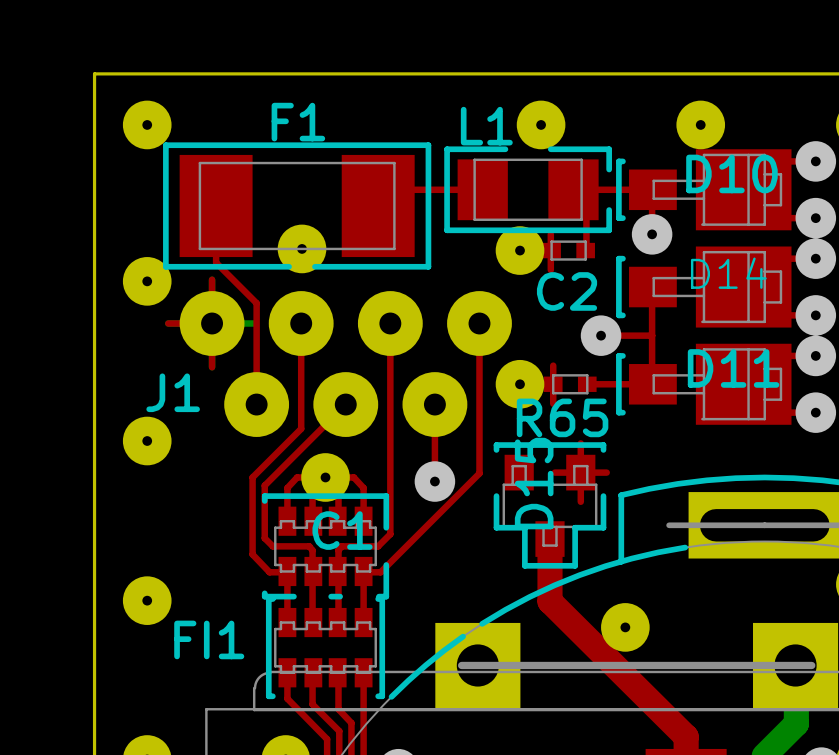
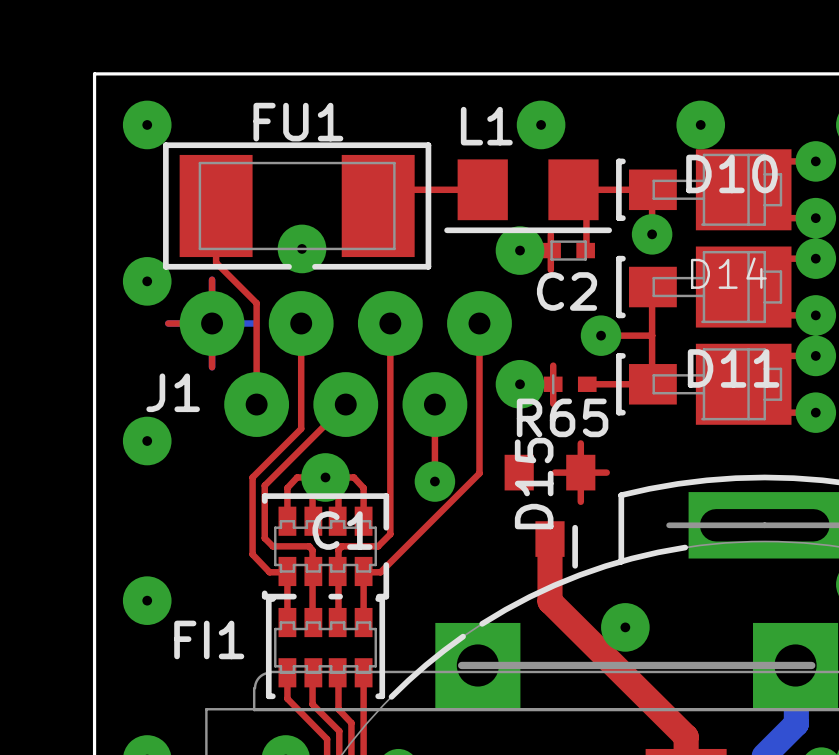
F1 name: F1 (298, 122) -> FU1 (298, 122)
L1 footprint: [444, 146, 612, 234] -> [444, 159, 612, 234]
R65 footprint: [543, 374, 597, 395] -> [543, 374, 597, 395]
D15 footprint: [493, 442, 607, 569] -> [504, 454, 596, 569]

